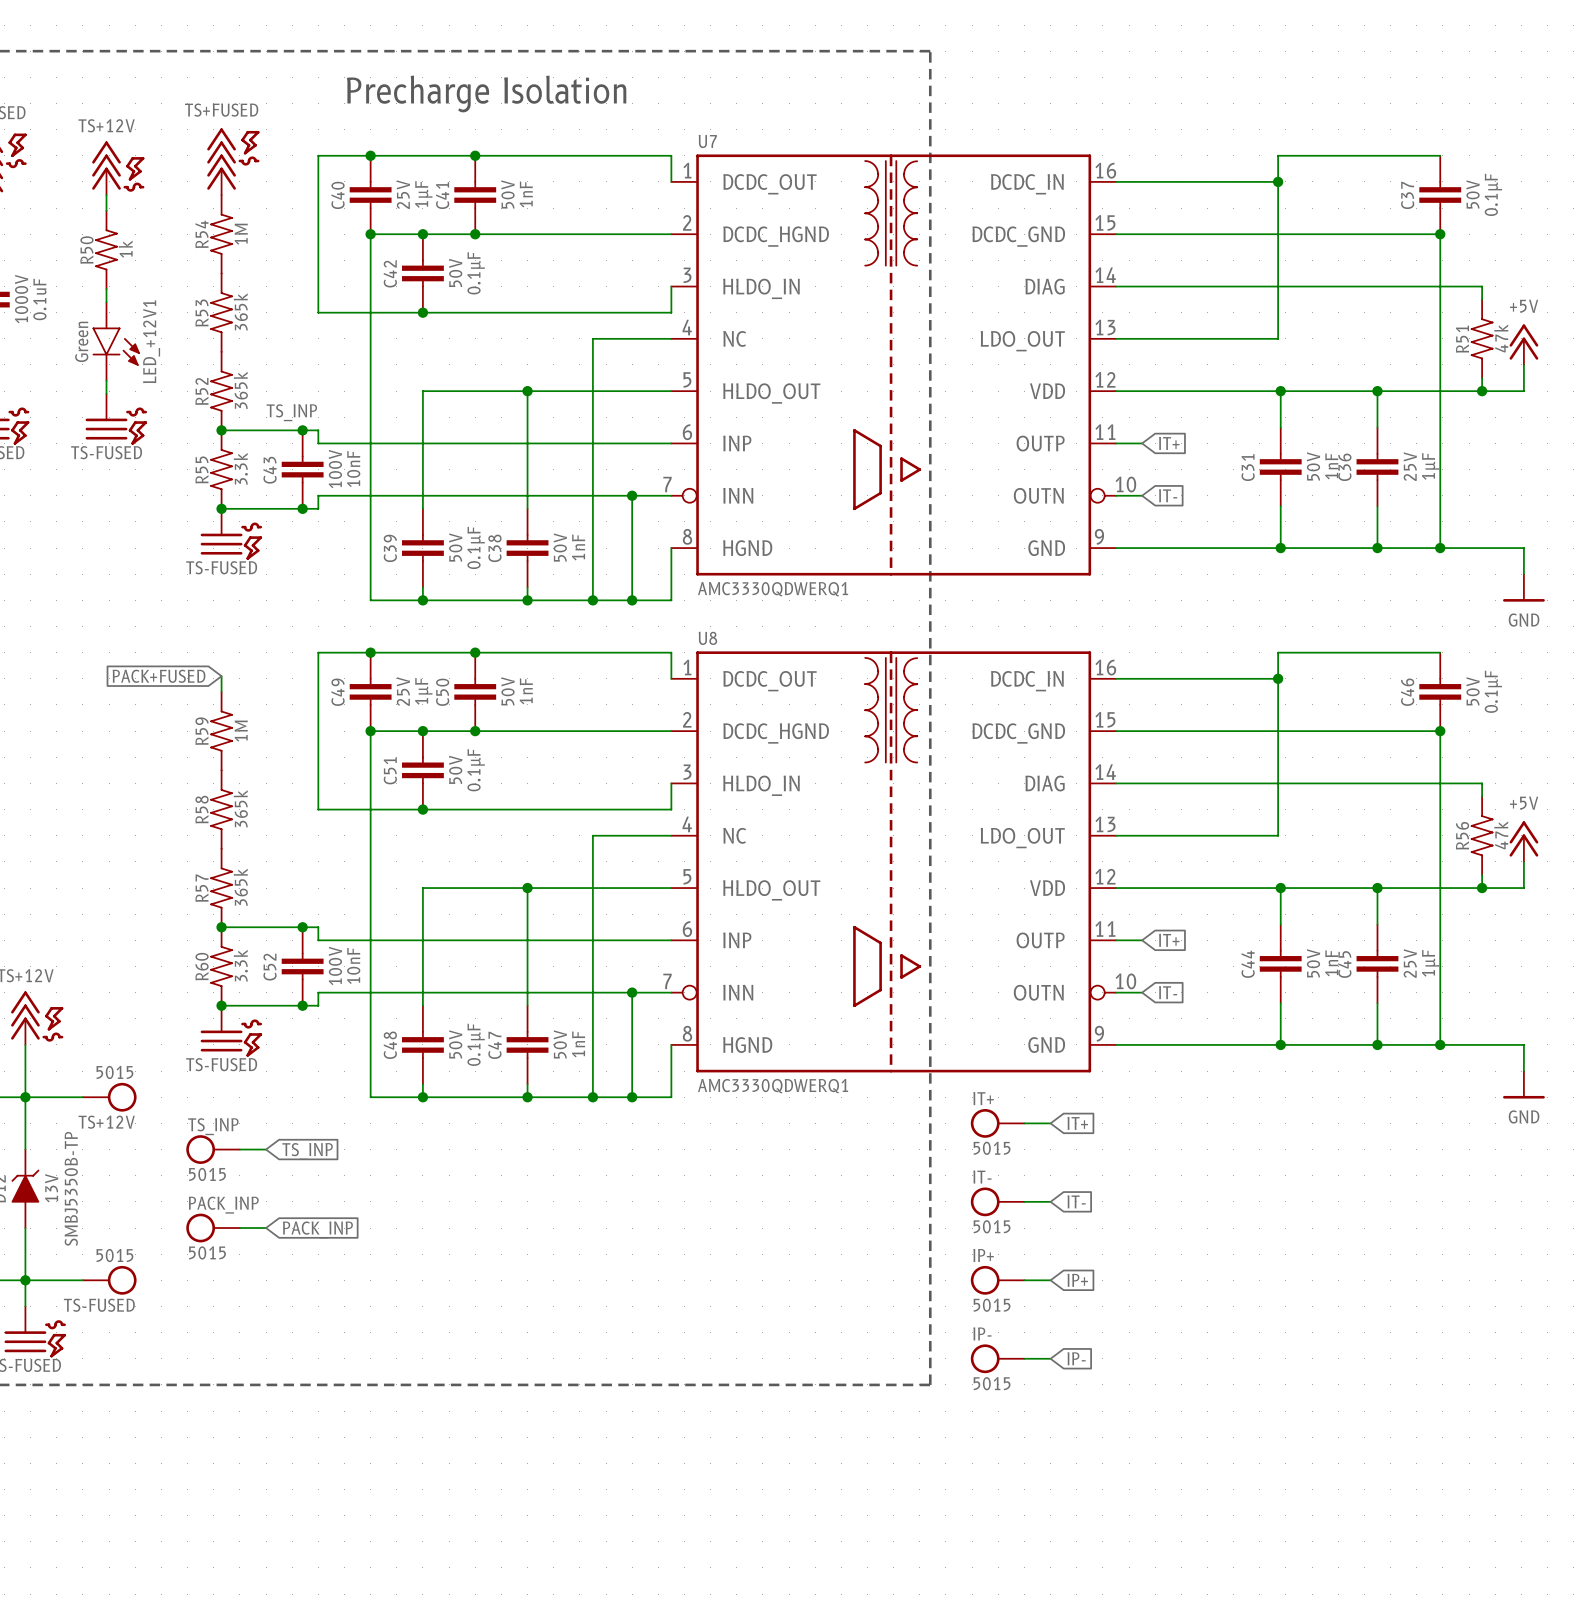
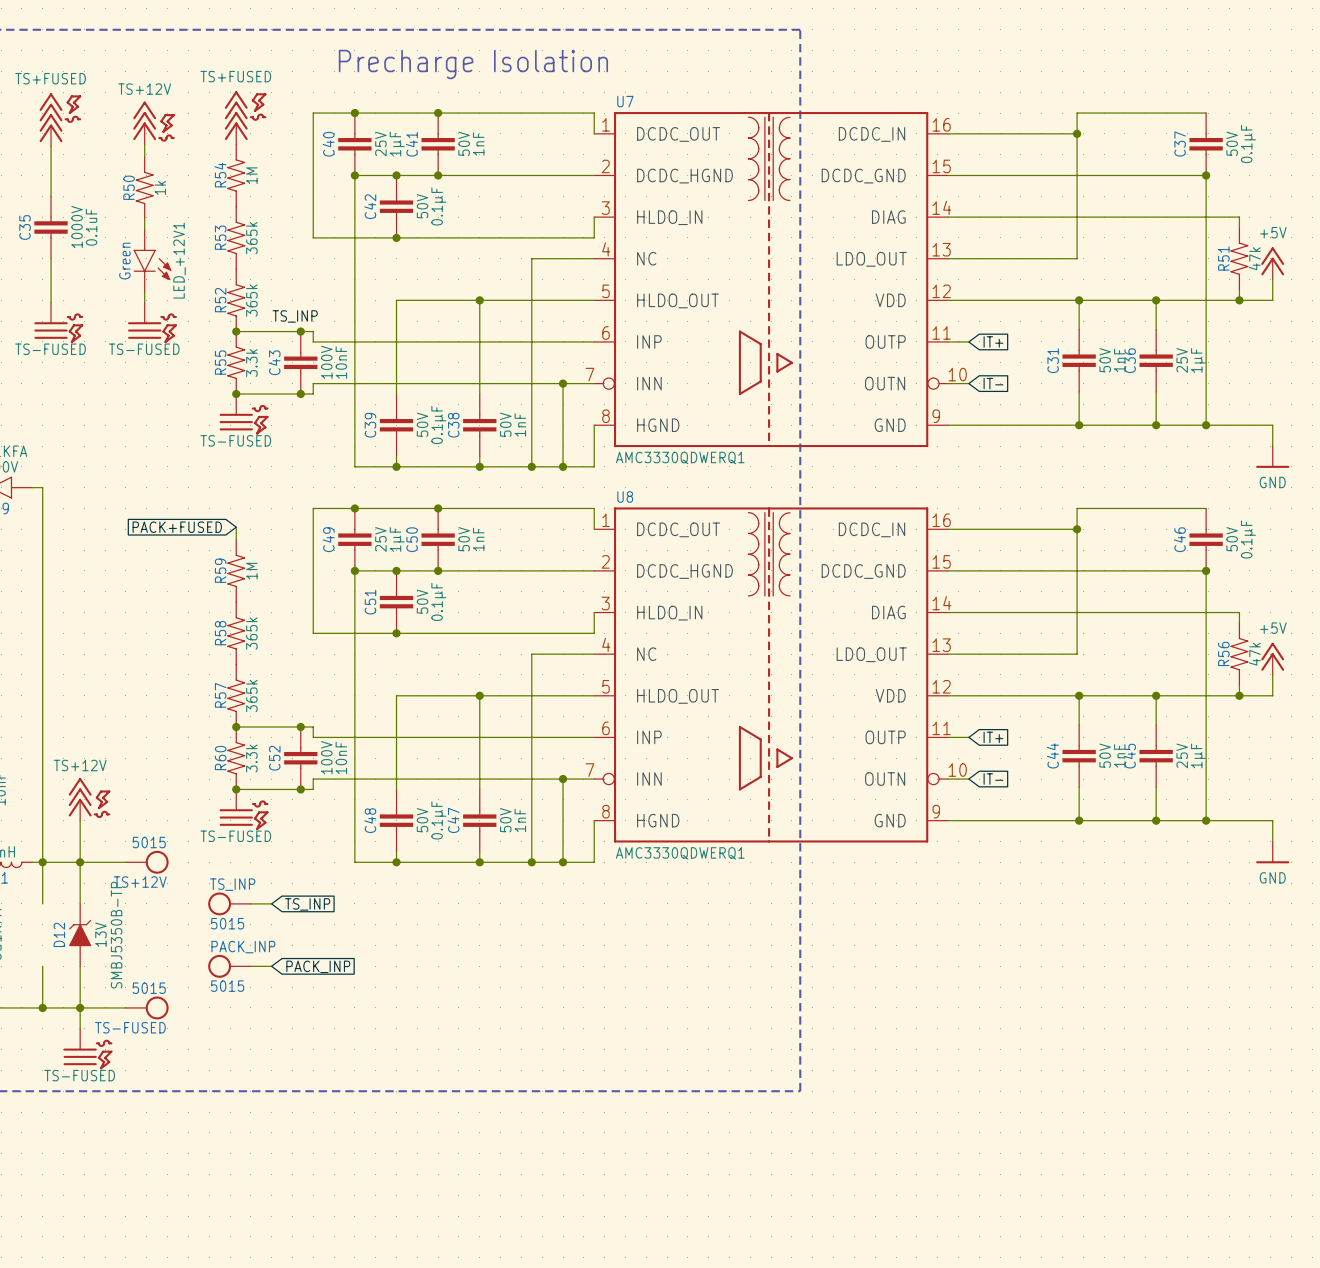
IT+: (997, 1123) -> none
wire: (1024, 1123) (1050, 1123) -> none
global label: IT+ (1077, 1123) -> none
IT-: (997, 1201) -> none
wire: (1024, 1201) (1050, 1201) -> none
global label: IT- (1076, 1201) -> none
IP+: (997, 1280) -> none
wire: (1024, 1280) (1050, 1280) -> none
global label: IP+ (1077, 1280) -> none
IP-: (997, 1358) -> none
wire: (1024, 1358) (1050, 1358) -> none
global label: IP- (1076, 1358) -> none

